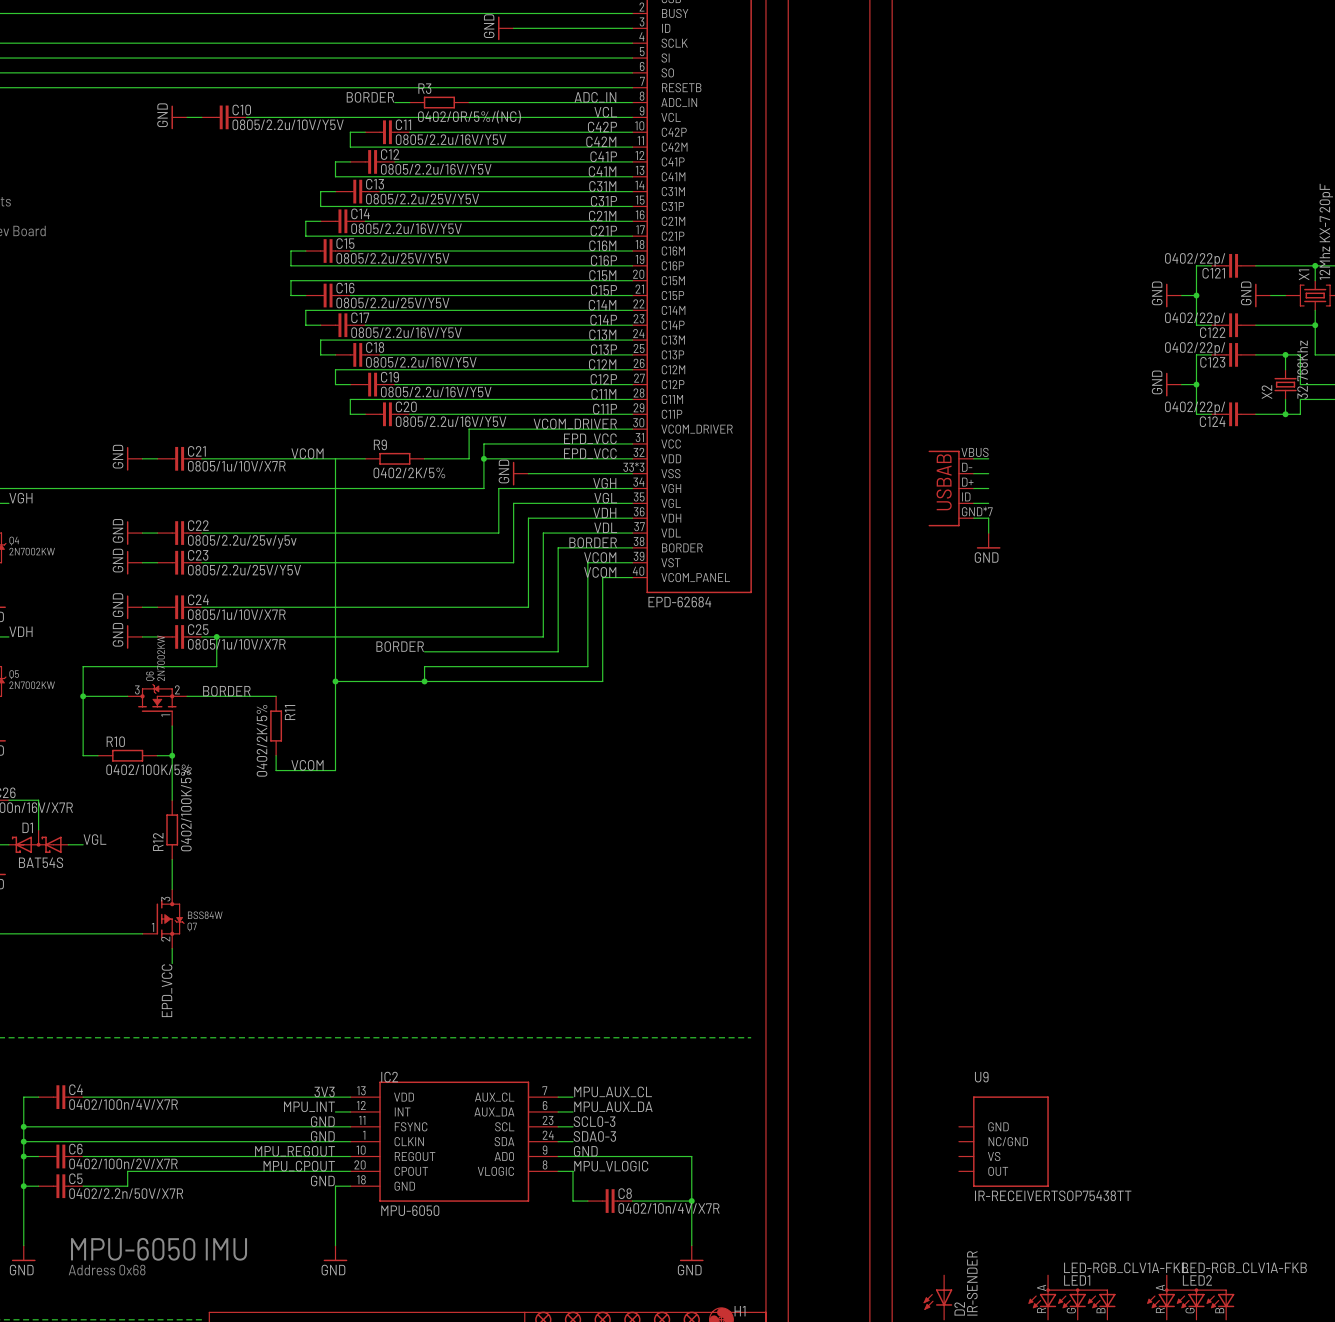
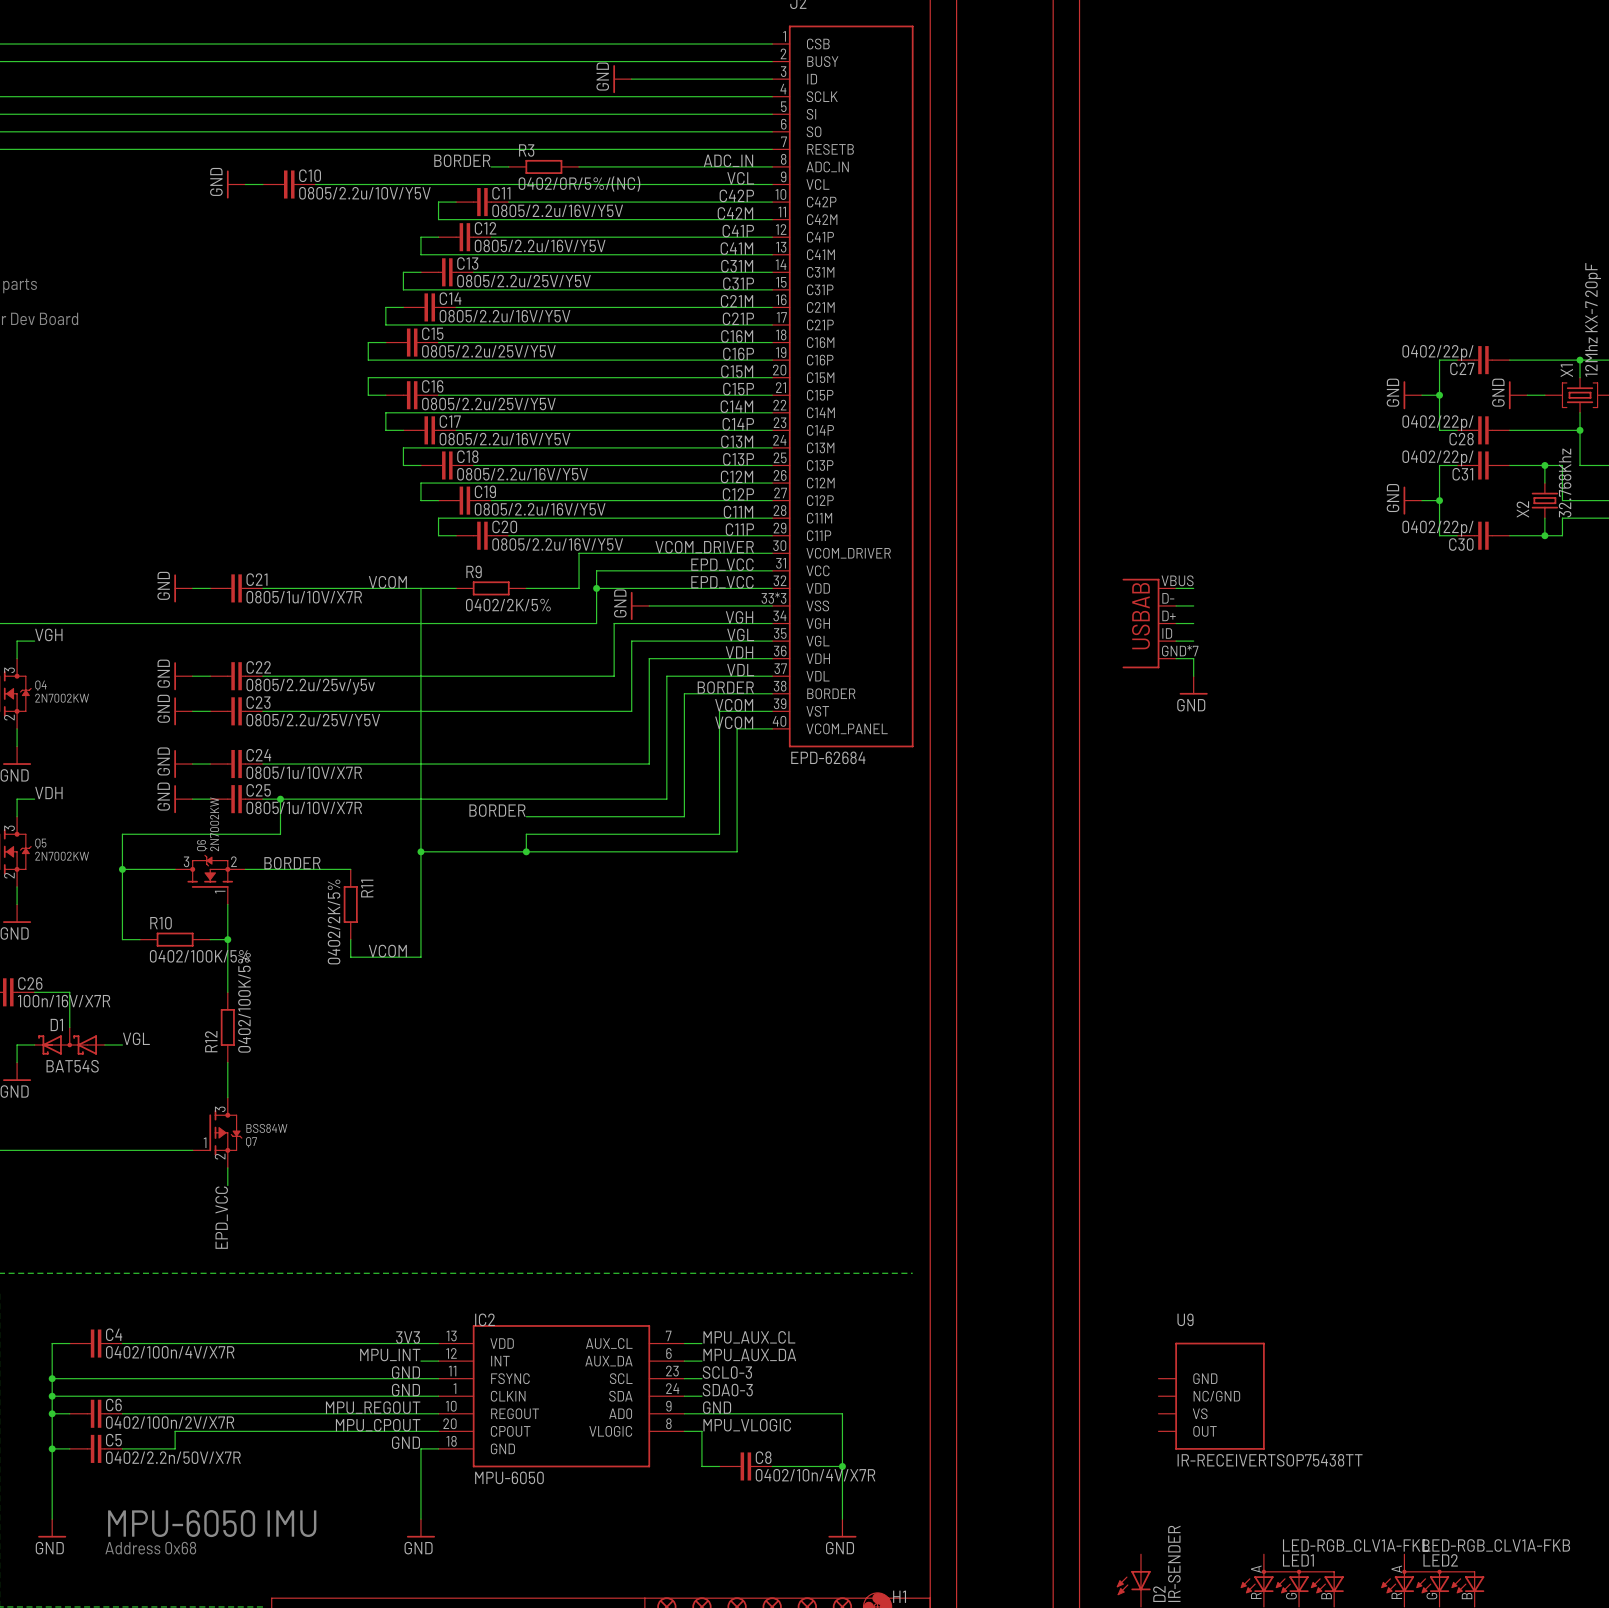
C121 name: C121 (1213, 273) -> C27 (1462, 368)
C122 name: C122 (1212, 332) -> C28 (1461, 439)
C123 name: C123 (1212, 362) -> C31 (1462, 474)
C124 name: C124 (1212, 421) -> C30 (1461, 544)

